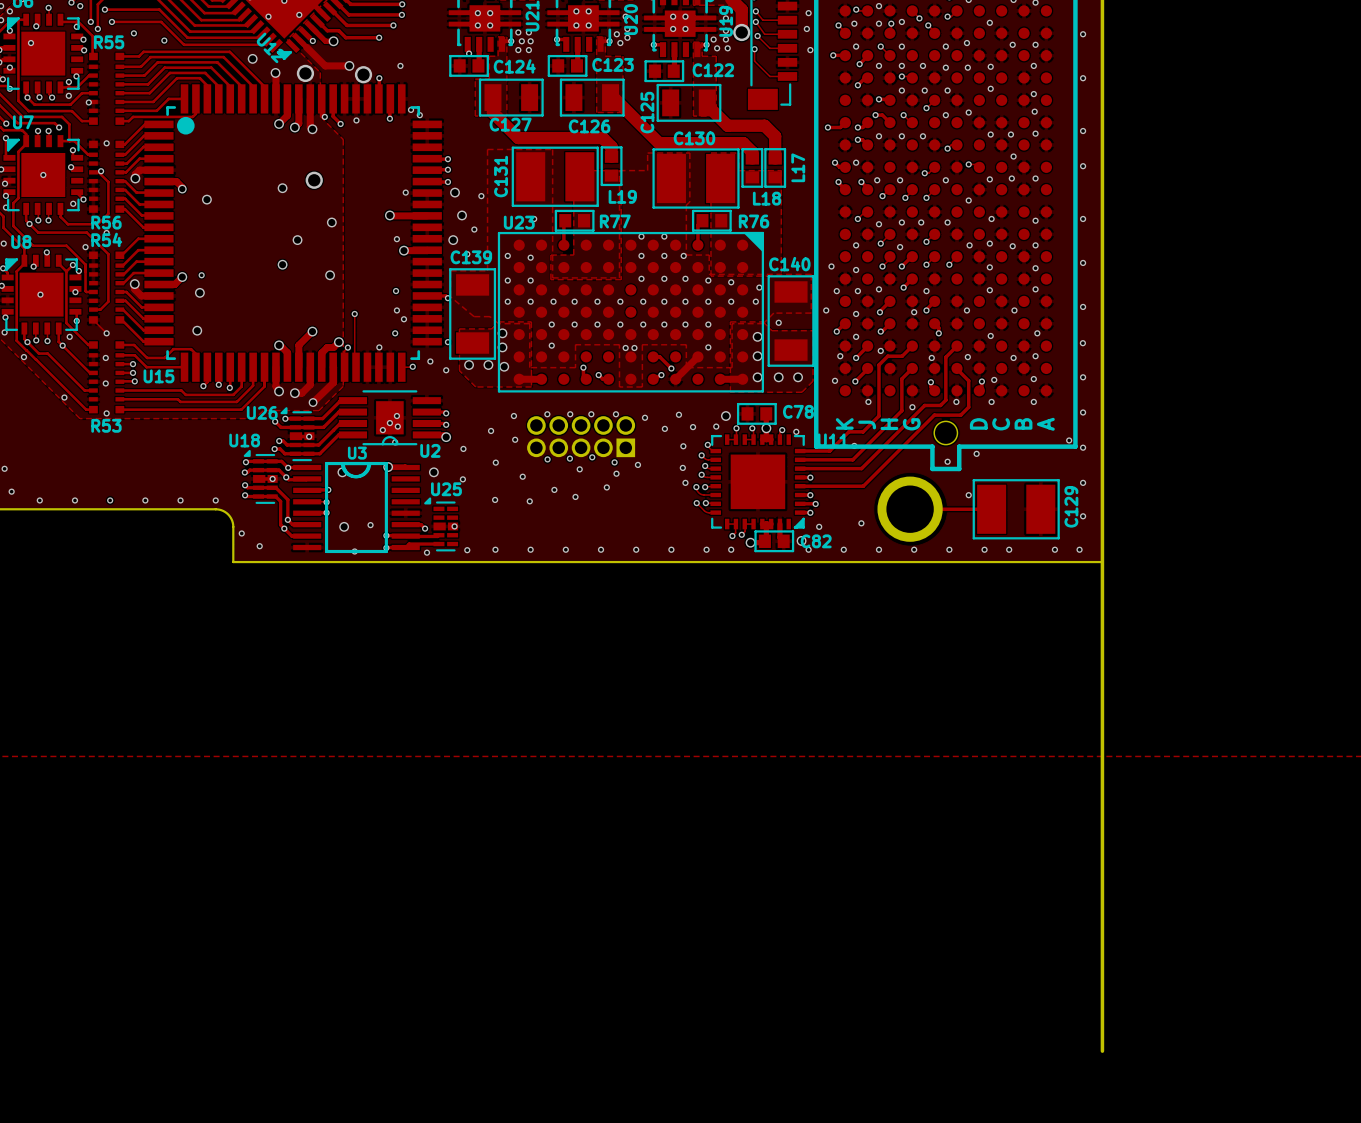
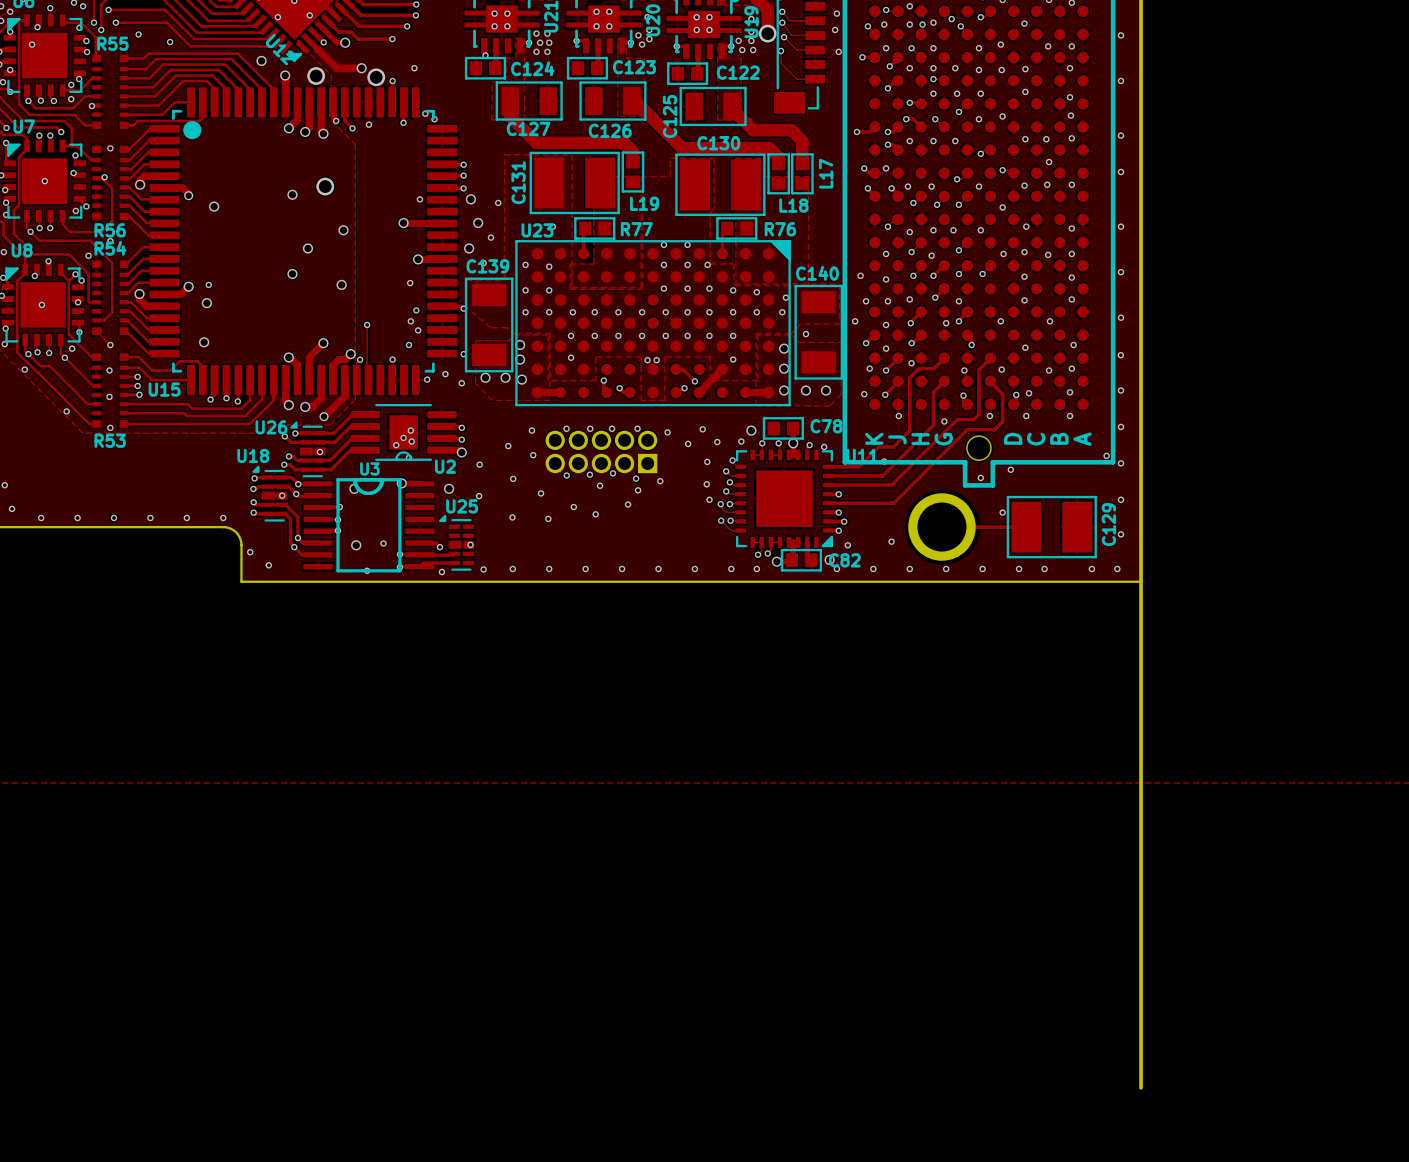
via: (396, 239) -> none
via: none -> (410, 283)
via: (396, 291) -> none
via: none -> (416, 310)

